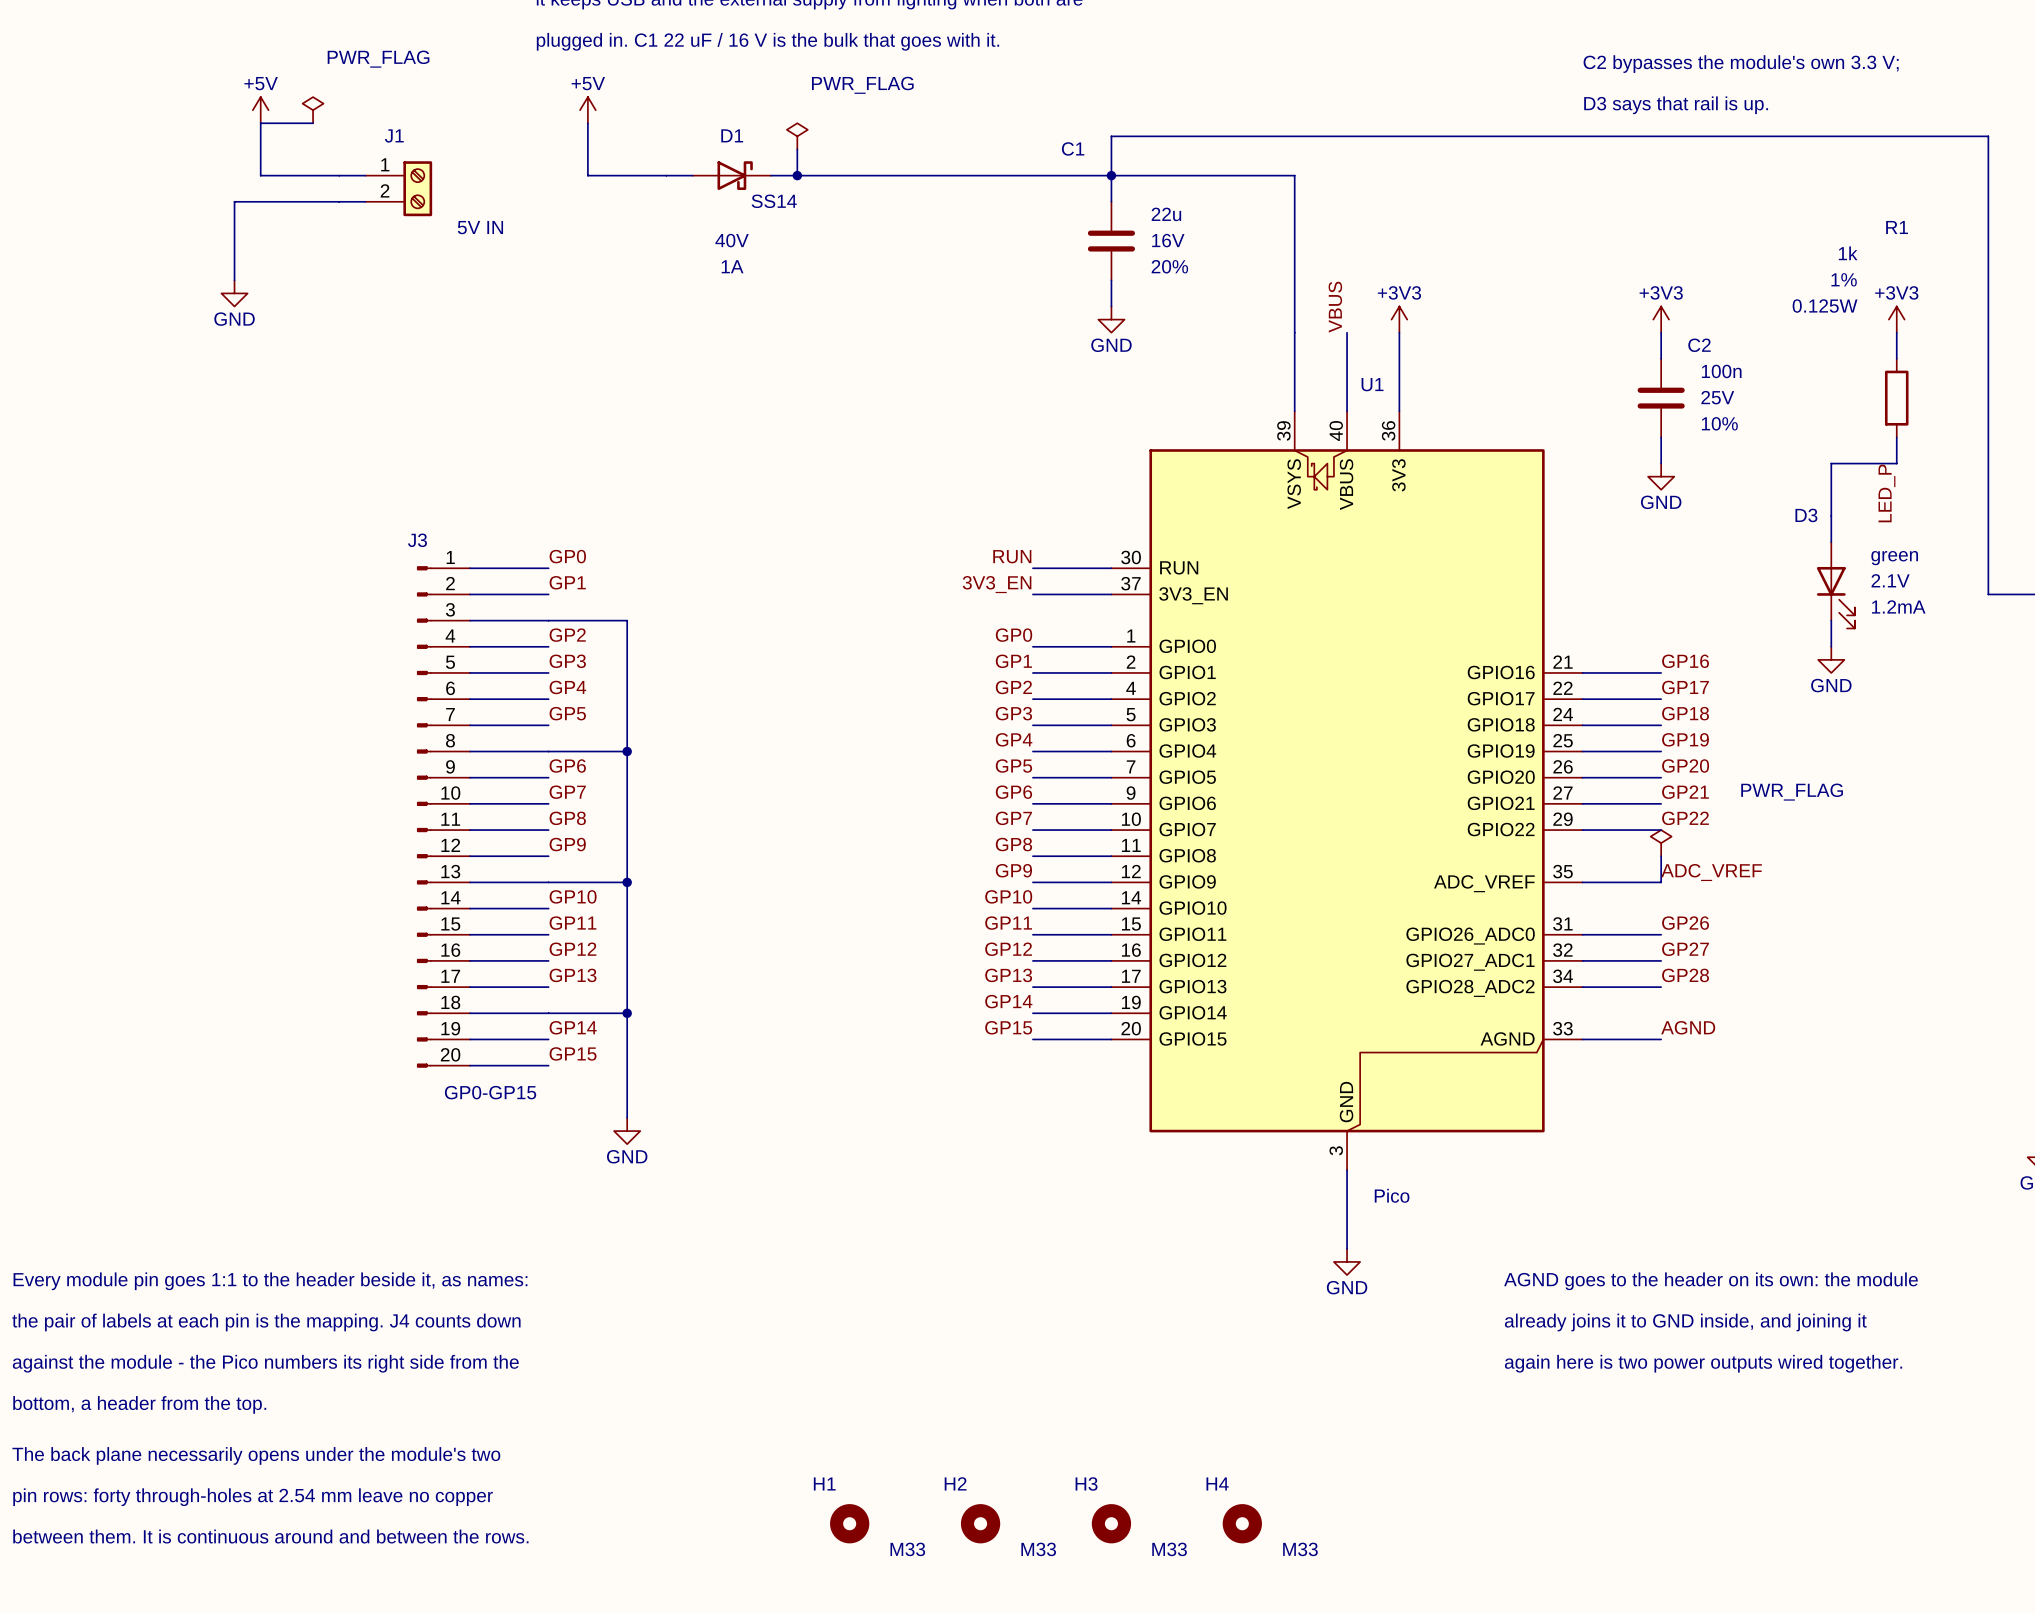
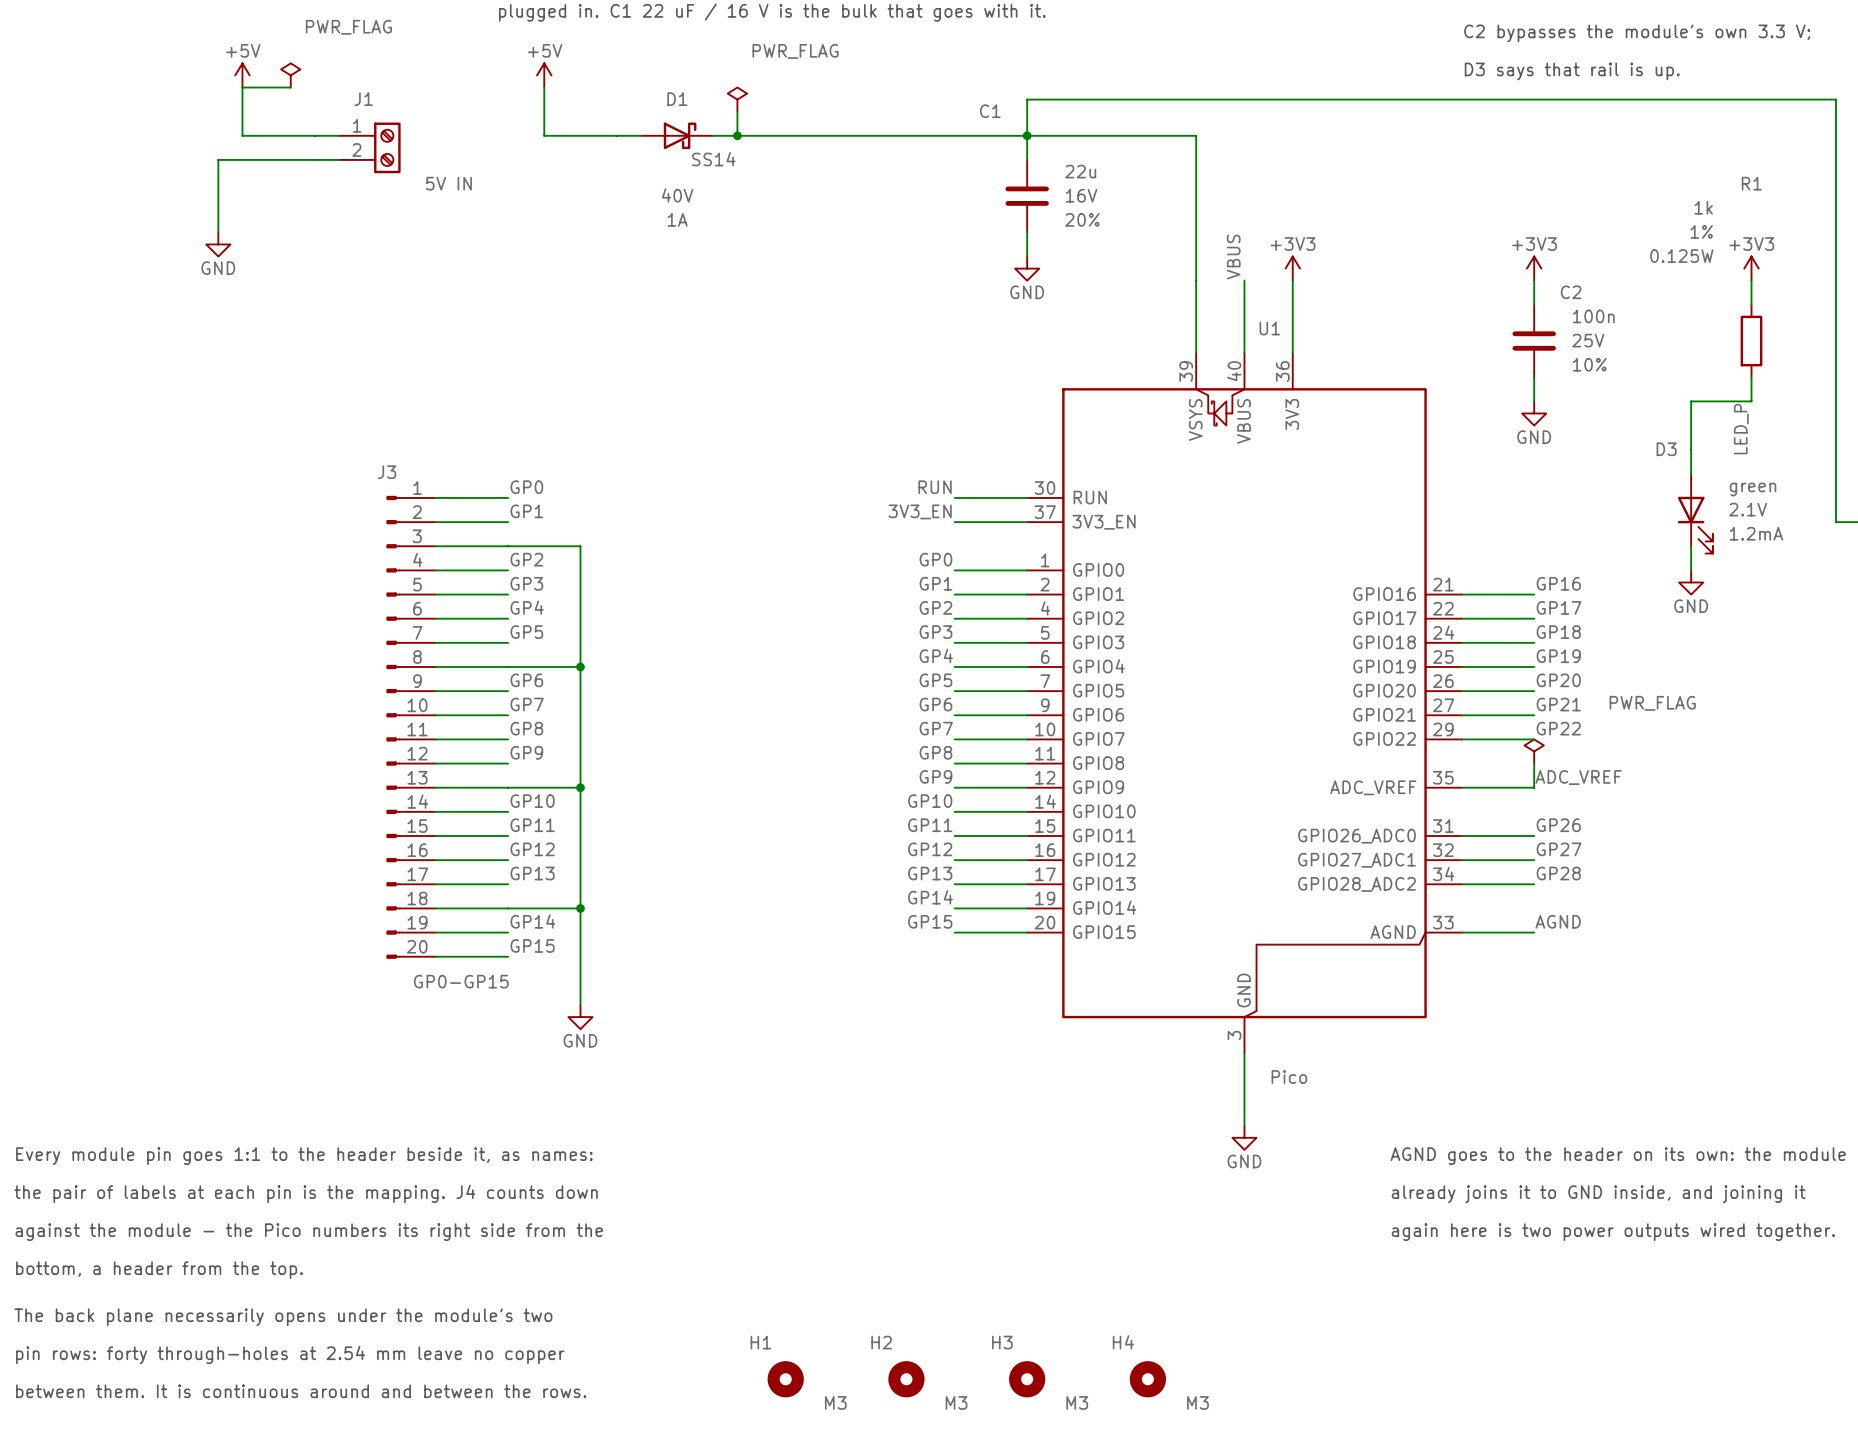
H1 value: M33 (907, 1549) -> M3 (835, 1402)
H2 value: M33 (1038, 1549) -> M3 (956, 1402)
H3 value: M33 (1169, 1549) -> M3 (1077, 1402)
H4 value: M33 (1300, 1549) -> M3 (1197, 1402)

